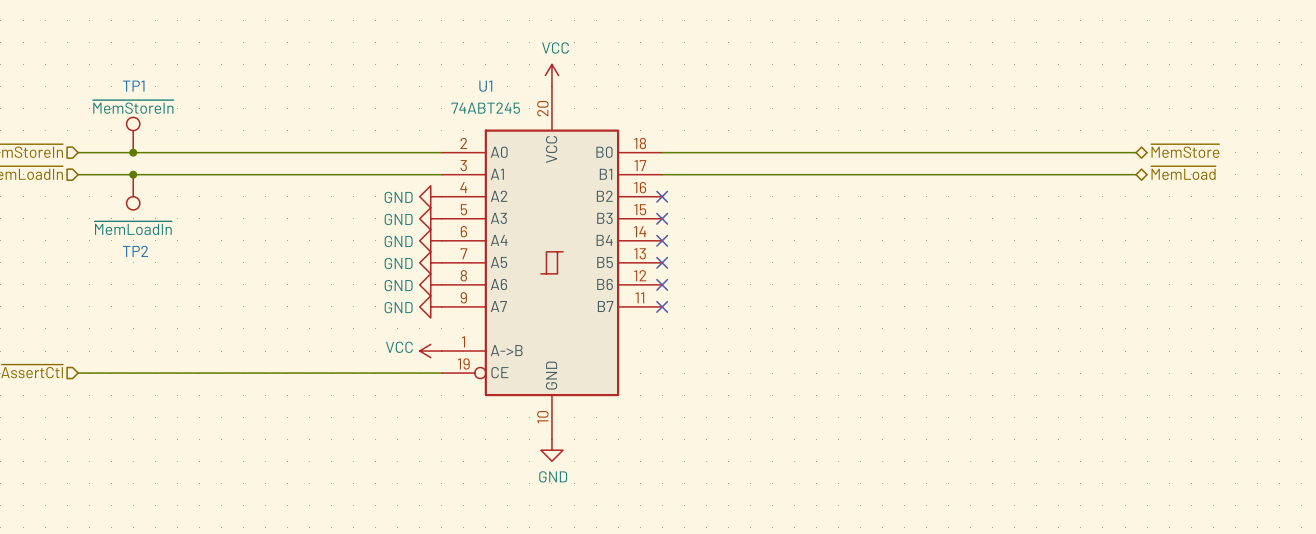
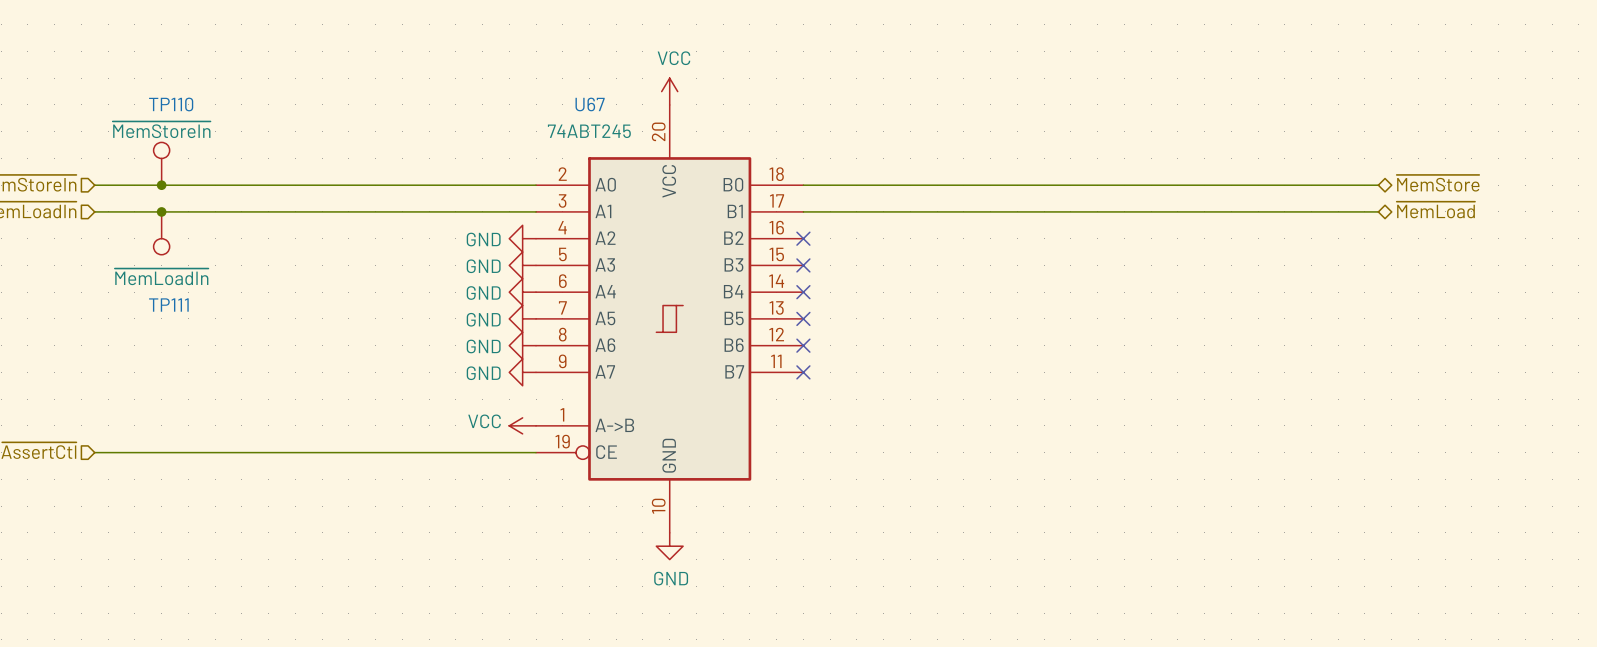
TP1 name: TP1 (133, 86) -> TP110 (171, 104)
U1 name: U1 (485, 86) -> U67 (590, 104)
TP2 name: TP2 (135, 251) -> TP111 (168, 305)

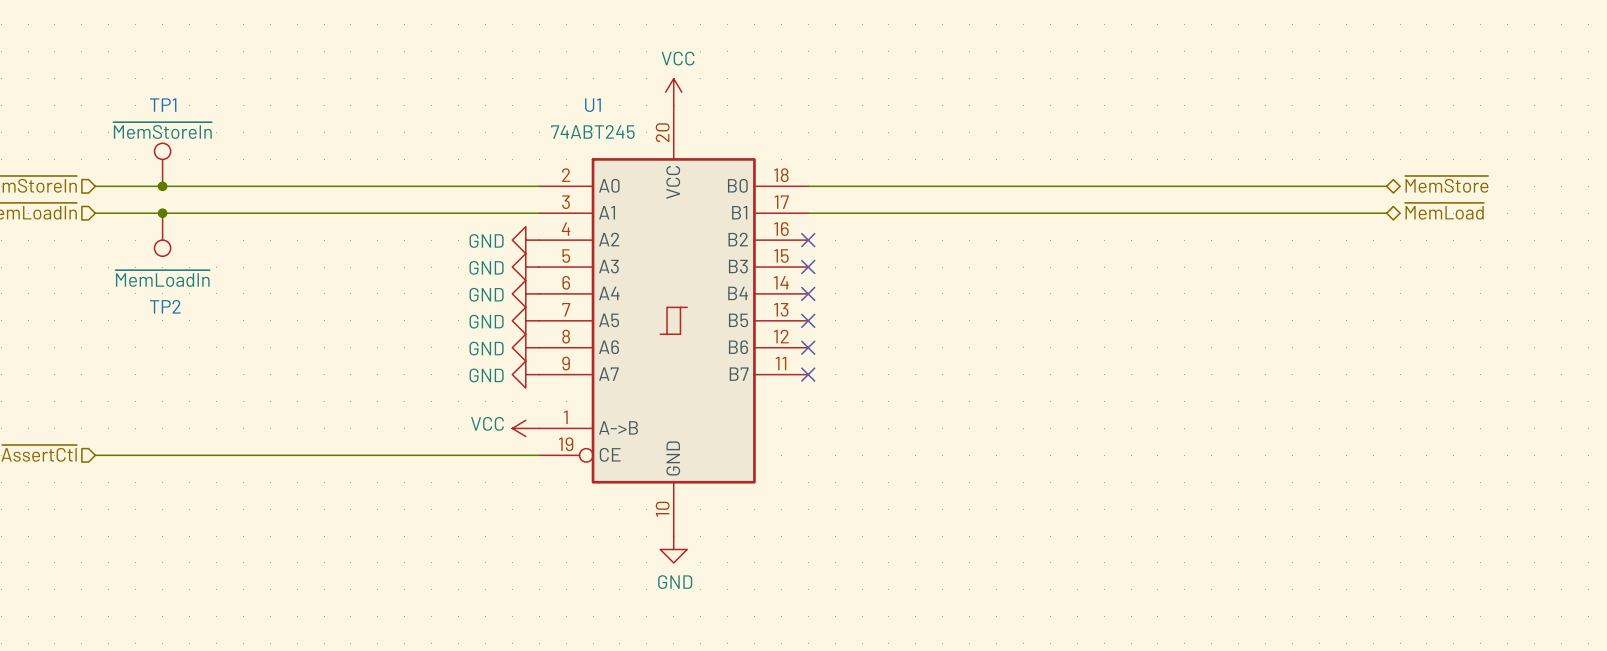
TP110 name: TP110 (171, 104) -> TP1 (163, 105)
U67 name: U67 (590, 104) -> U1 (592, 105)
TP111 name: TP111 (168, 305) -> TP2 (165, 306)

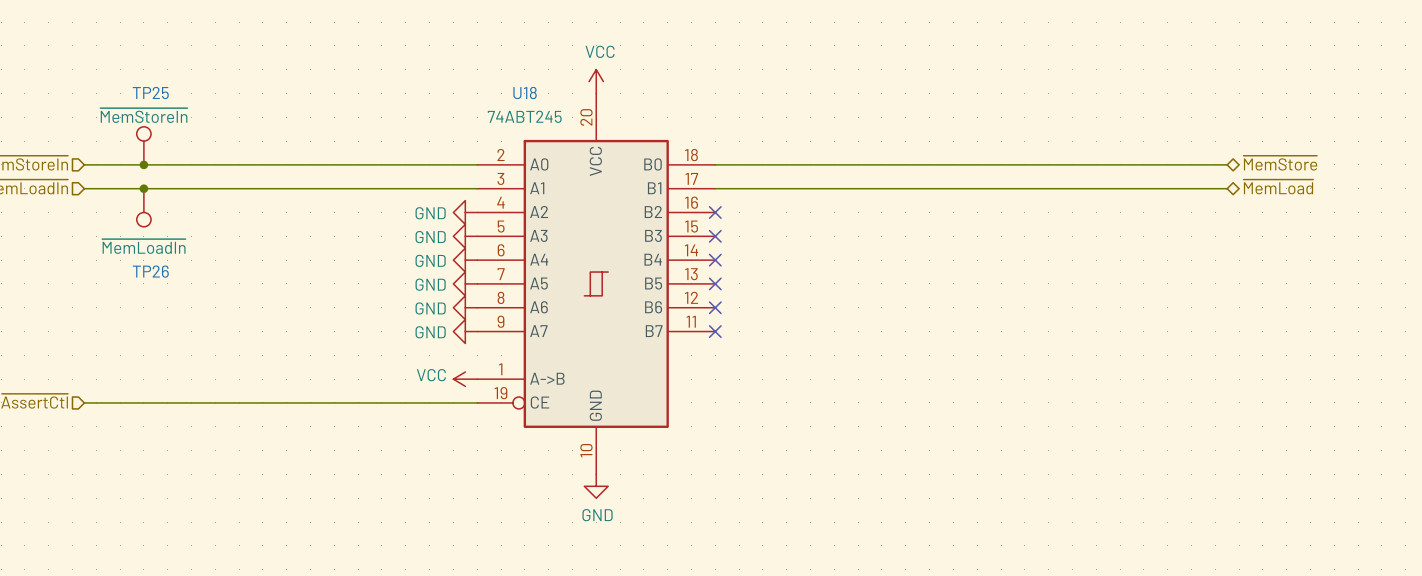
TP1 name: TP1 (163, 105) -> TP25 (150, 93)
U1 name: U1 (592, 105) -> U18 (525, 93)
TP2 name: TP2 (165, 306) -> TP26 (150, 271)

